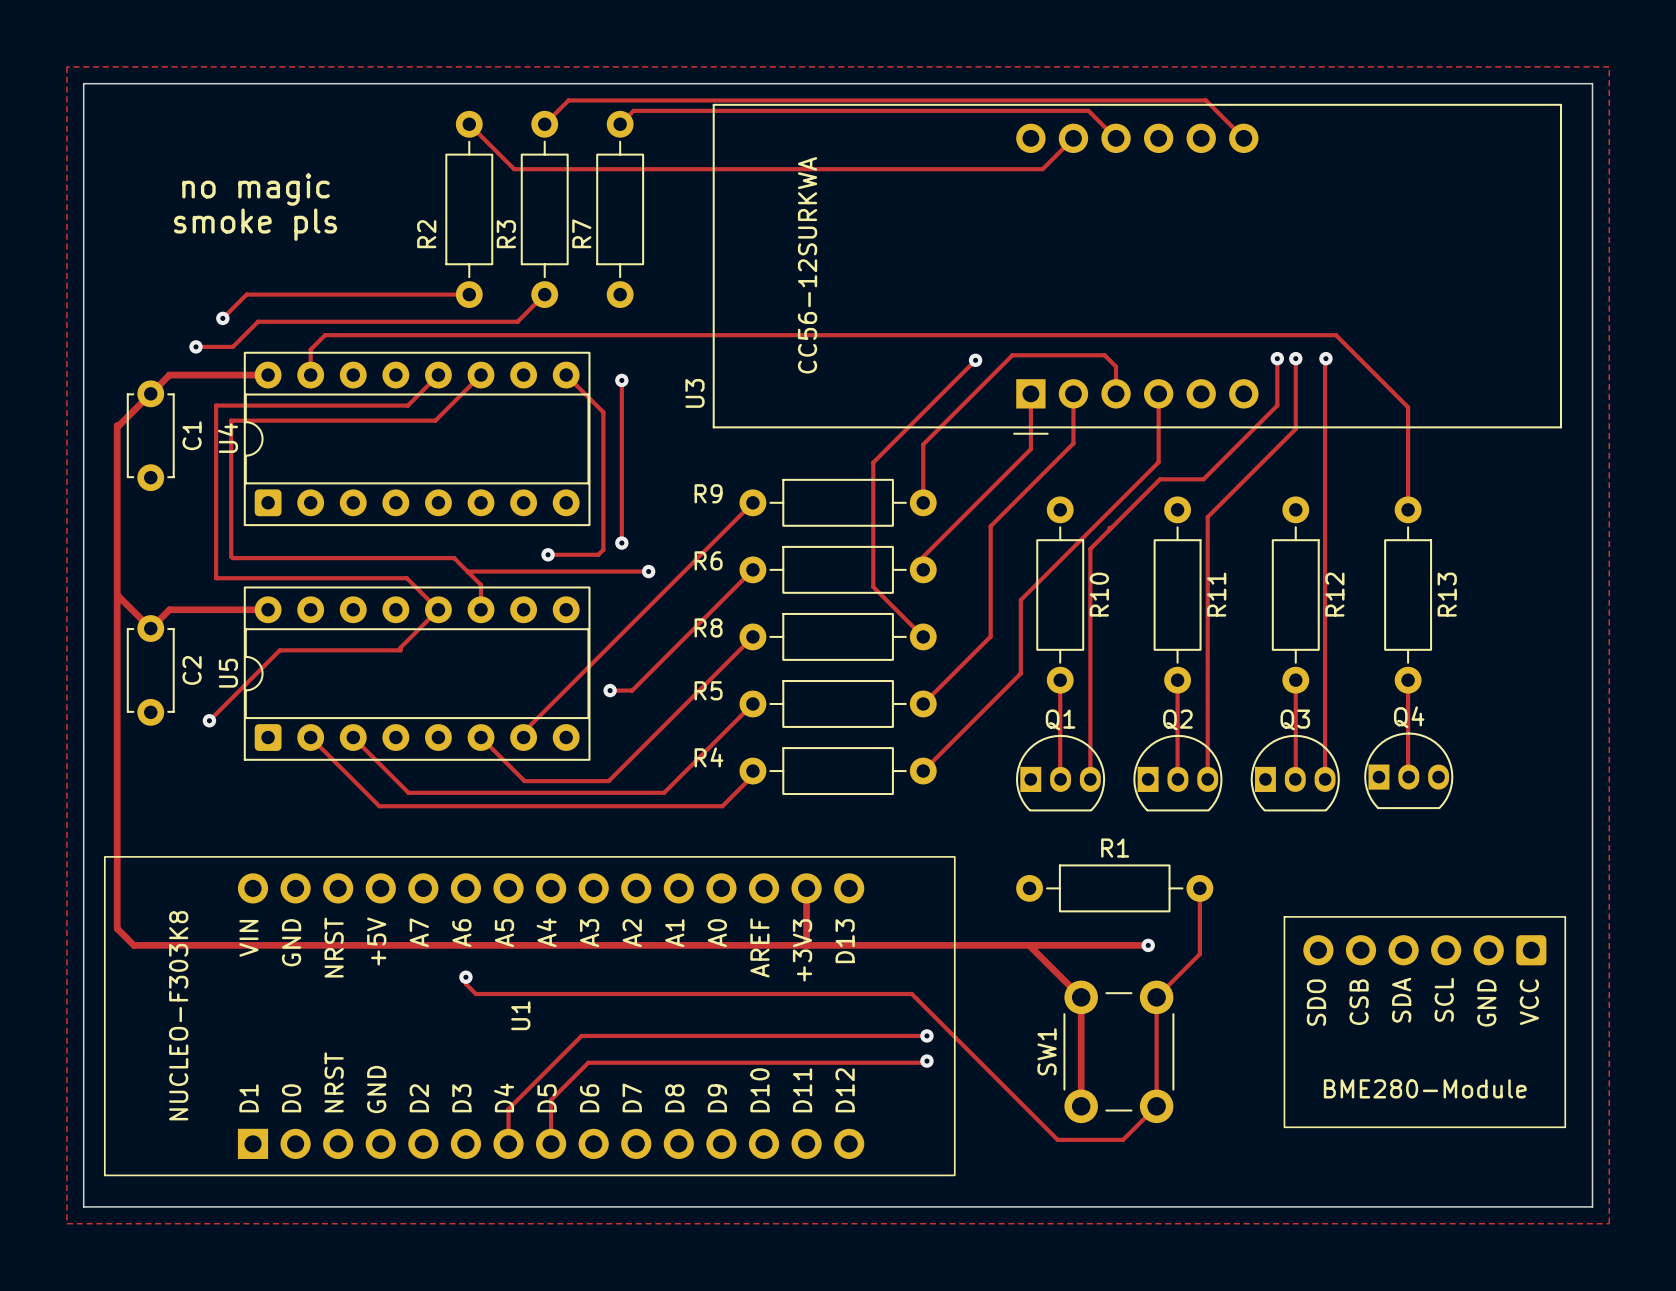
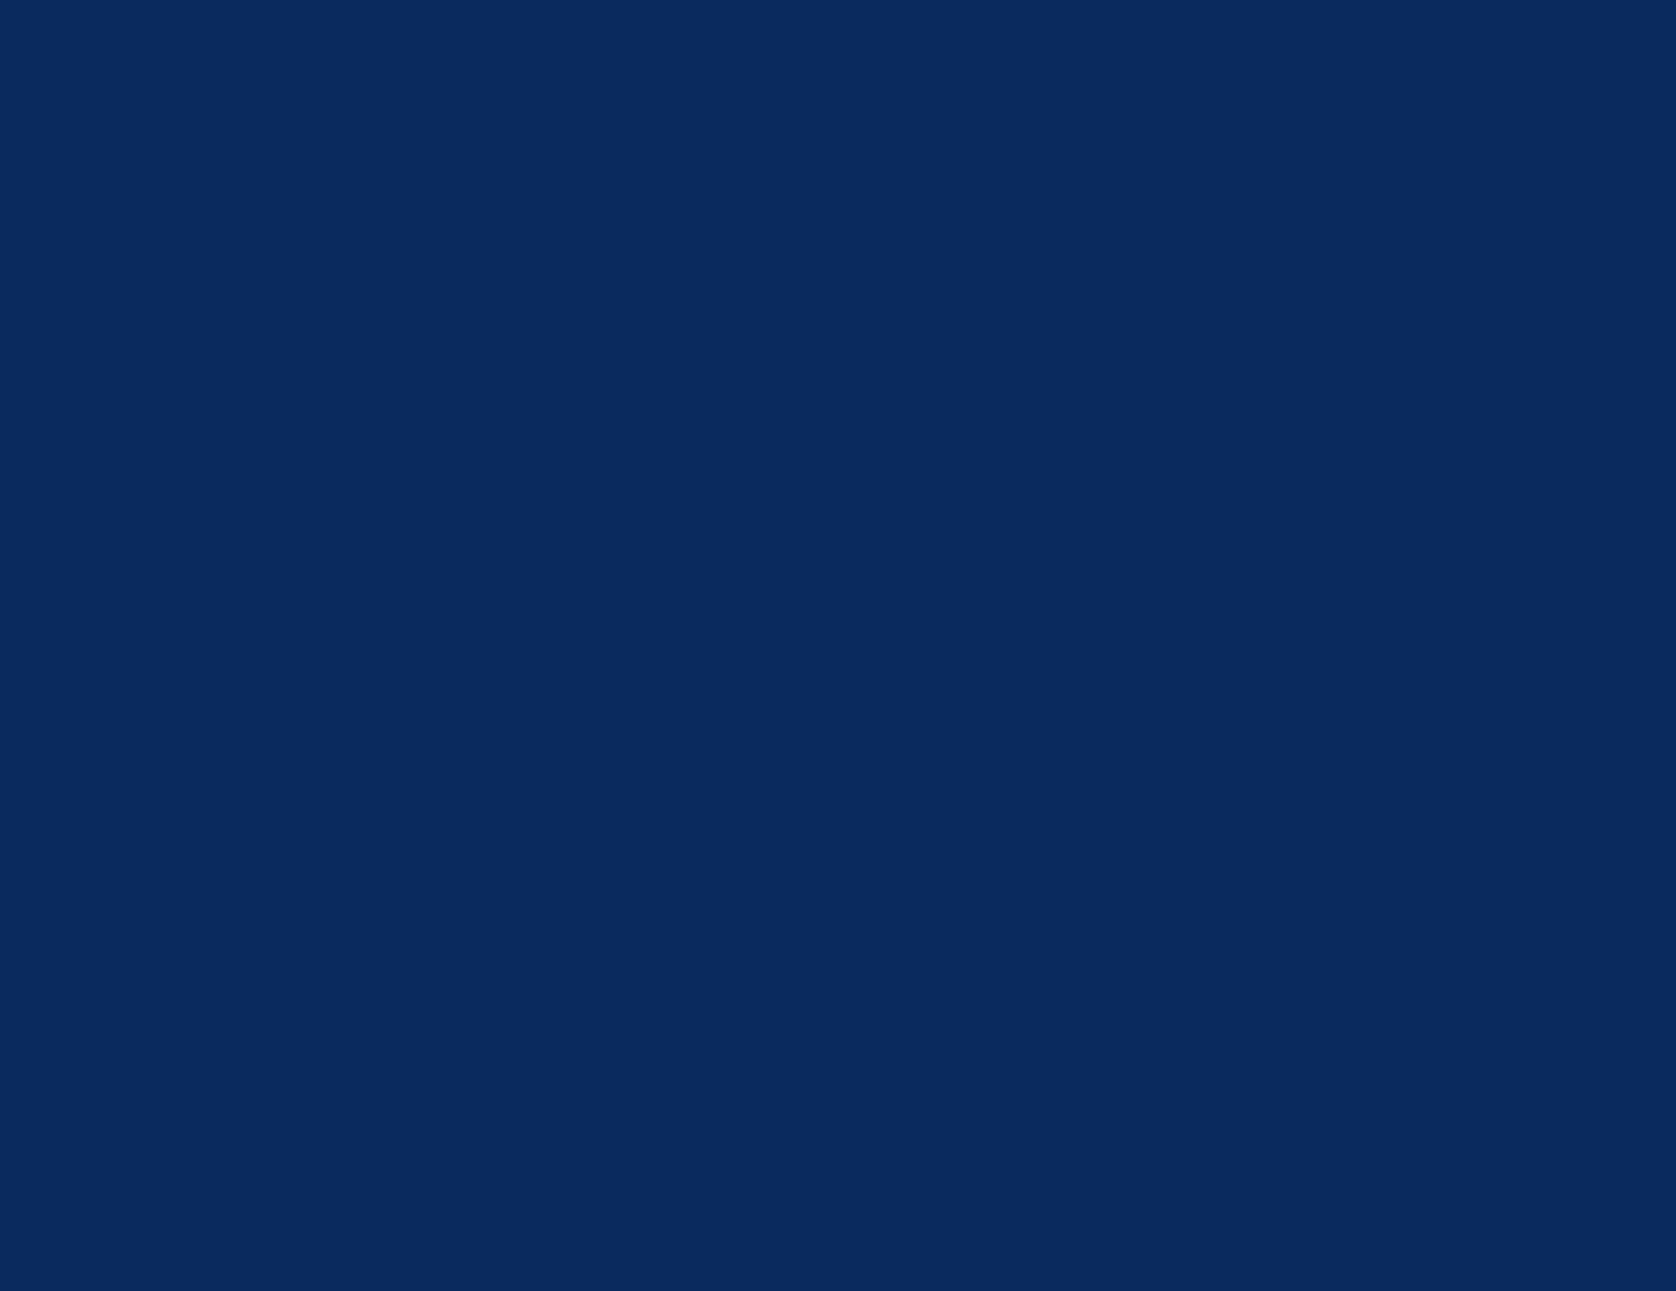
zone outline: (66, 66) (66, 1223) (1609, 1223) (1609, 66) (66, 66) -> none
board edge: (83, 83) (1592, 83) (1592, 1206) (83, 1206) (83, 83) -> none
track: (469, 124) (514, 169) (1042, 169) (1073, 138) -> none
track: (544, 124) (568, 100) (1205, 100) (1243, 138) -> none
track: (620, 124) (633, 110) (1088, 110) (1116, 138) -> none
text: no magic (256, 189) -> none
R2: (469, 209) -> none
R3: (544, 209) -> none
R7: (620, 209) -> none
text: smoke pls (255, 224) -> none
U3: (1137, 269) -> none
track: (469, 294) (246, 294) (222, 318) -> none
track: (544, 294) (517, 321) (258, 321) (232, 346) (196, 346) -> none
via: (222, 318) -> none
via: (196, 346) -> none
track: (1277, 358) (1277, 405) (1203, 479) (1159, 479) (1090, 548) (1090, 779) -> none
via: (1277, 358) -> none
track: (1295, 358) (1295, 429) (1207, 517) (1207, 779) -> none
via: (1295, 358) -> none
track: (1325, 358) (1325, 779) -> none
via: (1325, 358) -> none
track: (975, 360) (873, 462) (873, 586) (923, 636) -> none
via: (975, 360) -> none
track: (268, 375) (169, 375) (117, 425) (117, 928) (133, 945) (1148, 945) -> none
track: (310, 375) (310, 349) (325, 335) (1336, 335) (1408, 407) (1408, 509) -> none
track: (438, 375) (407, 405) (216, 405) (216, 578) (406, 578) (438, 609) (400, 647) (400, 650) (279, 650) (209, 720) -> none
track: (481, 375) (435, 420) (231, 420) (231, 556) (232, 558) (454, 558) (481, 584) (481, 609) -> none
track: (566, 375) (603, 412) (603, 549) (598, 554) (548, 554) -> none
track: (621, 380) (621, 543) -> none
via: (621, 380) -> none
track: (1030, 393) (1030, 449) (923, 556) (923, 569) -> none
track: (1073, 393) (1073, 443) (990, 526) (990, 636) (923, 703) -> none
track: (1116, 393) (1116, 366) (1104, 355) (1012, 355) (923, 444) (923, 502) -> none
track: (1158, 393) (1158, 462) (1020, 600) (1020, 673) (923, 771) -> none
C1: (150, 435) -> none
U4: (417, 438) -> none
track: (752, 502) (523, 732) (523, 737) -> none
R9: (838, 502) -> none
via: (621, 543) -> none
via: (548, 554) -> none
track: (752, 569) (632, 690) (610, 690) -> none
R6: (838, 569) -> none
track: (467, 571) (648, 571) -> none
via: (648, 571) -> none
track: (117, 595) (150, 628) (169, 609) (268, 609) -> none
R10: (1060, 595) -> none
R11: (1177, 595) -> none
R12: (1295, 595) -> none
R13: (1408, 595) -> none
track: (752, 636) (608, 781) (524, 781) (481, 737) -> none
R8: (838, 636) -> none
C2: (150, 670) -> none
U5: (417, 673) -> none
track: (1060, 680) (1060, 779) -> none
track: (1177, 680) (1177, 779) -> none
track: (1295, 680) (1295, 779) -> none
track: (1408, 680) (1408, 777) -> none
via: (610, 690) -> none
track: (752, 703) (664, 792) (408, 792) (353, 737) -> none
R5: (838, 703) -> none
via: (209, 720) -> none
track: (310, 737) (379, 806) (722, 806) (752, 775) (752, 771) -> none
Q4: (1408, 770) -> none
R4: (838, 771) -> none
Q1: (1060, 773) -> none
Q2: (1177, 773) -> none
Q3: (1295, 773) -> none
track: (806, 888) (806, 945) -> none
R1: (1114, 888) -> none
track: (1199, 888) (1199, 954) (1156, 997) (1156, 1106) (1123, 1139) (1057, 1139) (911, 994) (475, 994) (465, 983) (465, 977) -> none
track: (1029, 945) (1081, 997) (1081, 1106) -> none
via: (1148, 945) -> none
via: (465, 977) -> none
U1: (529, 1016) -> none
part: (1424, 1022) -> none
track: (926, 1035) (581, 1035) (508, 1109) (508, 1143) -> none
via: (926, 1035) -> none
SW1: (1118, 1051) -> none
track: (926, 1061) (925, 1062) (588, 1062) (551, 1099) (551, 1143) -> none
via: (926, 1061) -> none

